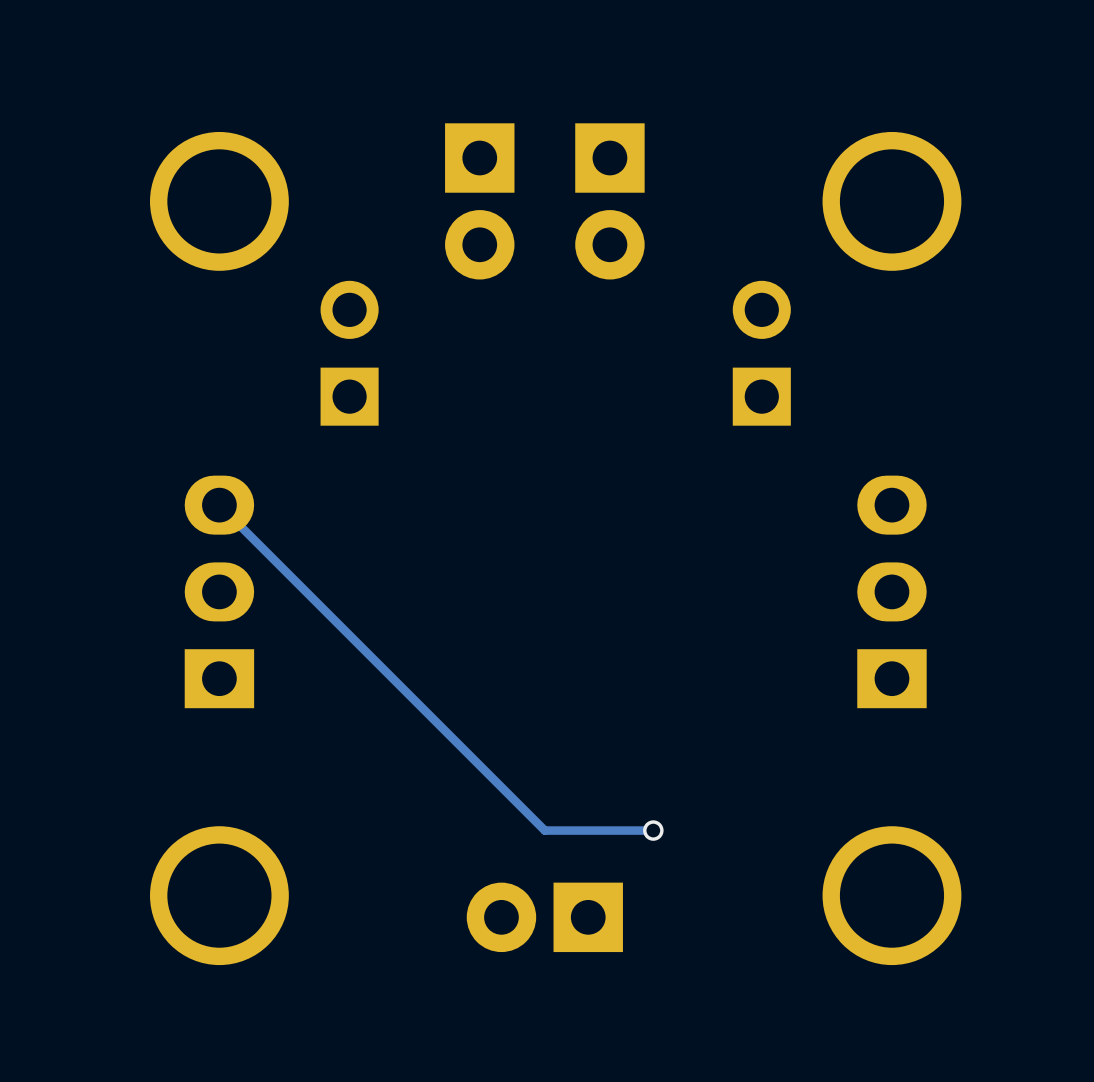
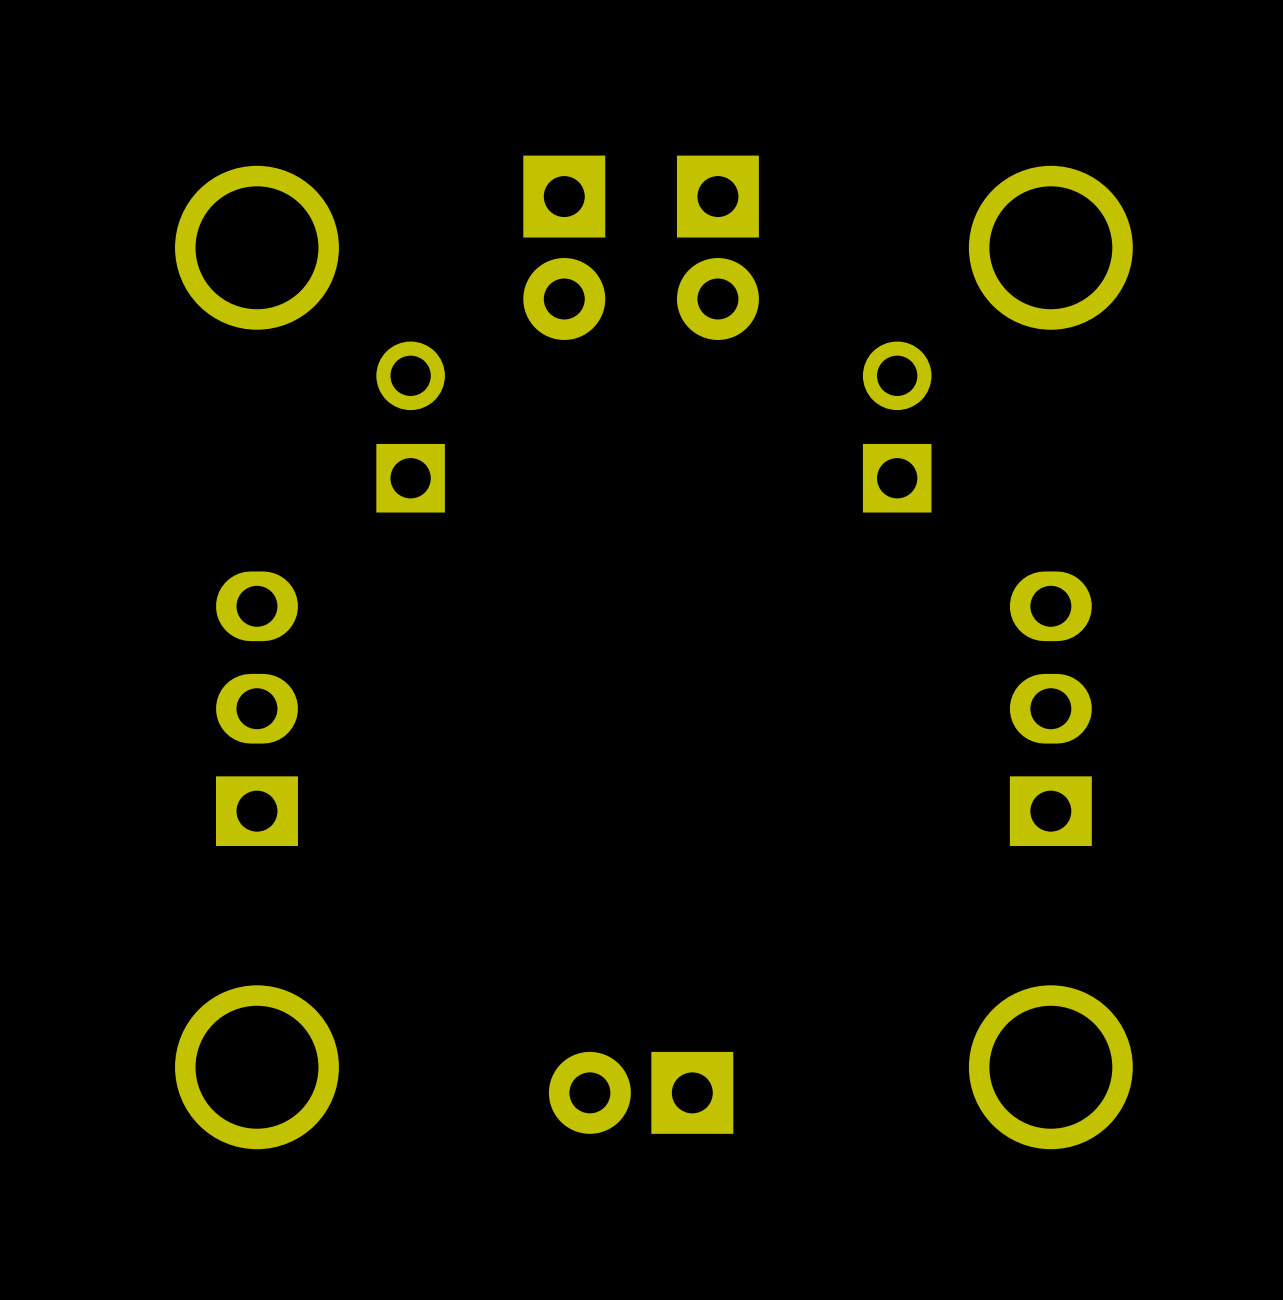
track: (219, 505) (544, 830) (653, 830) -> none
via: (653, 830) -> none

